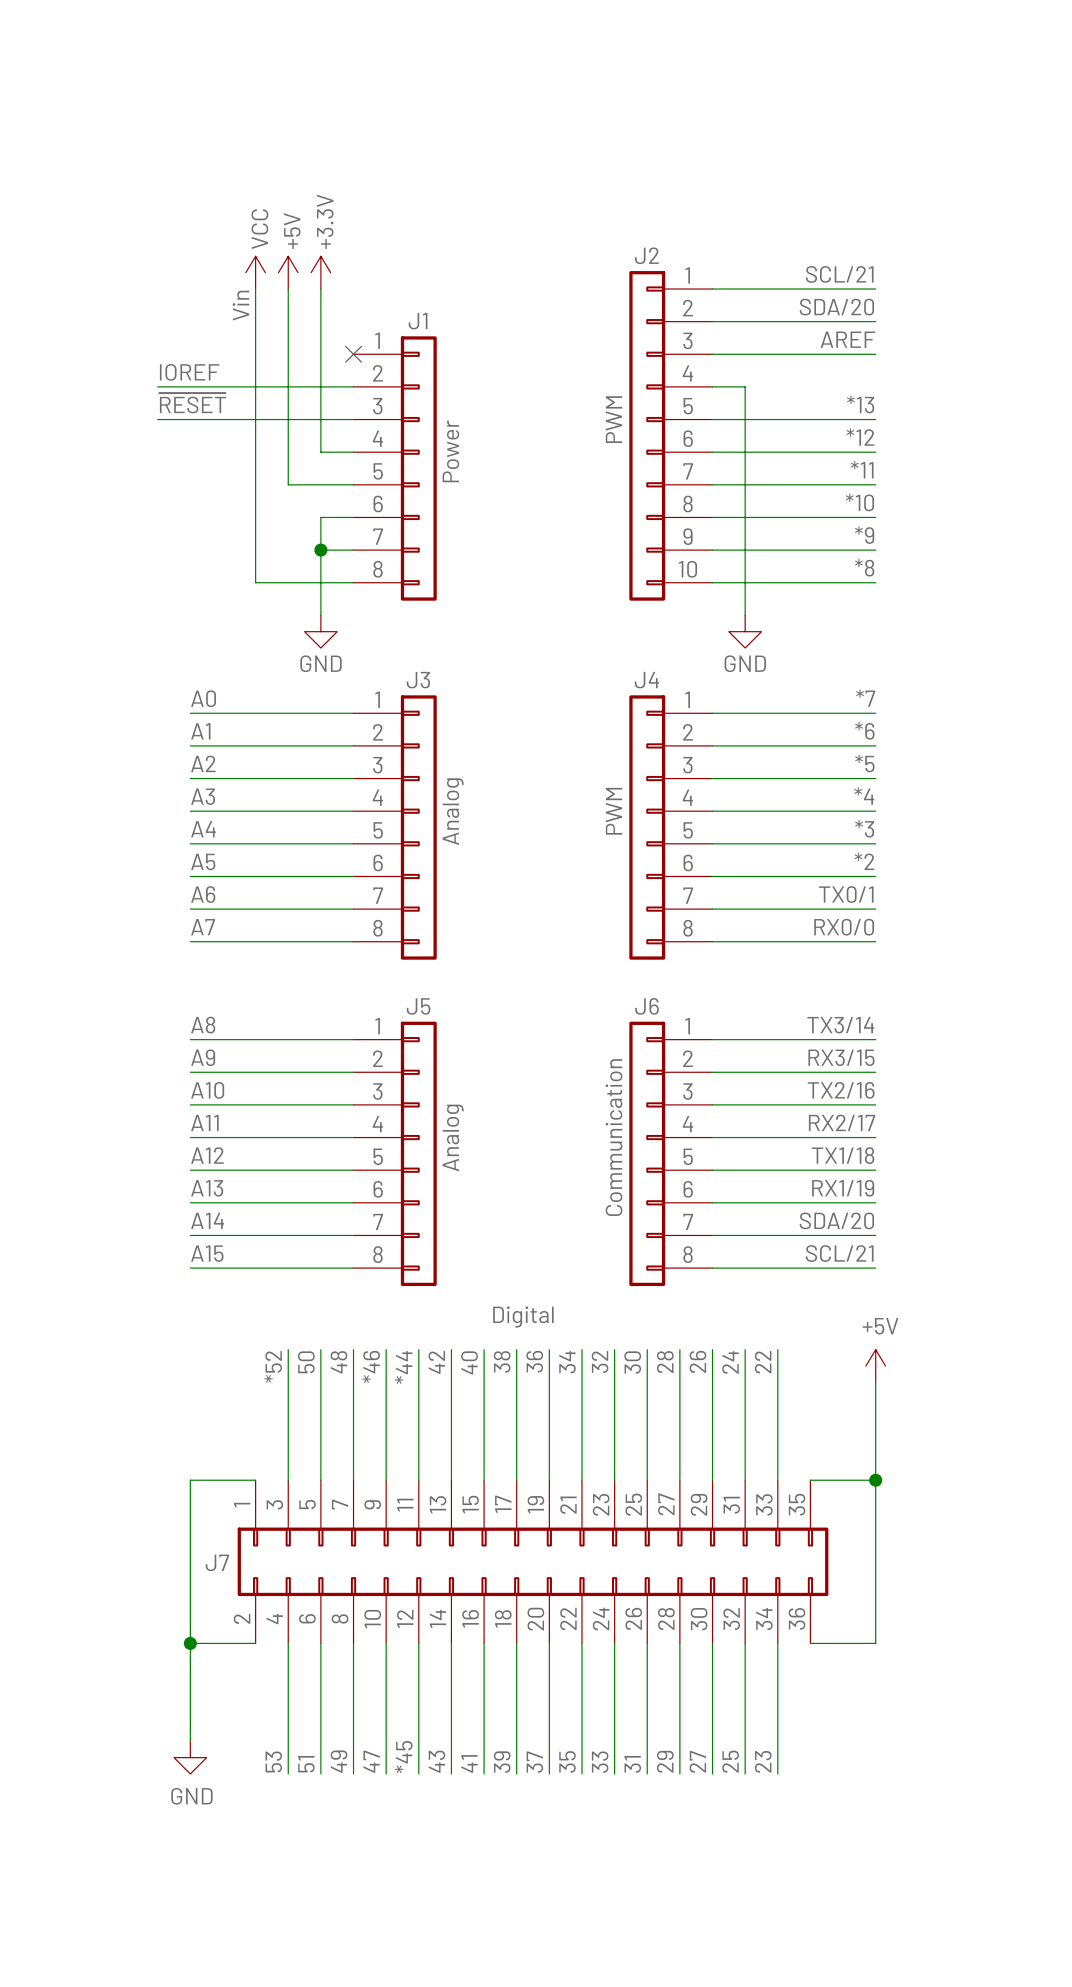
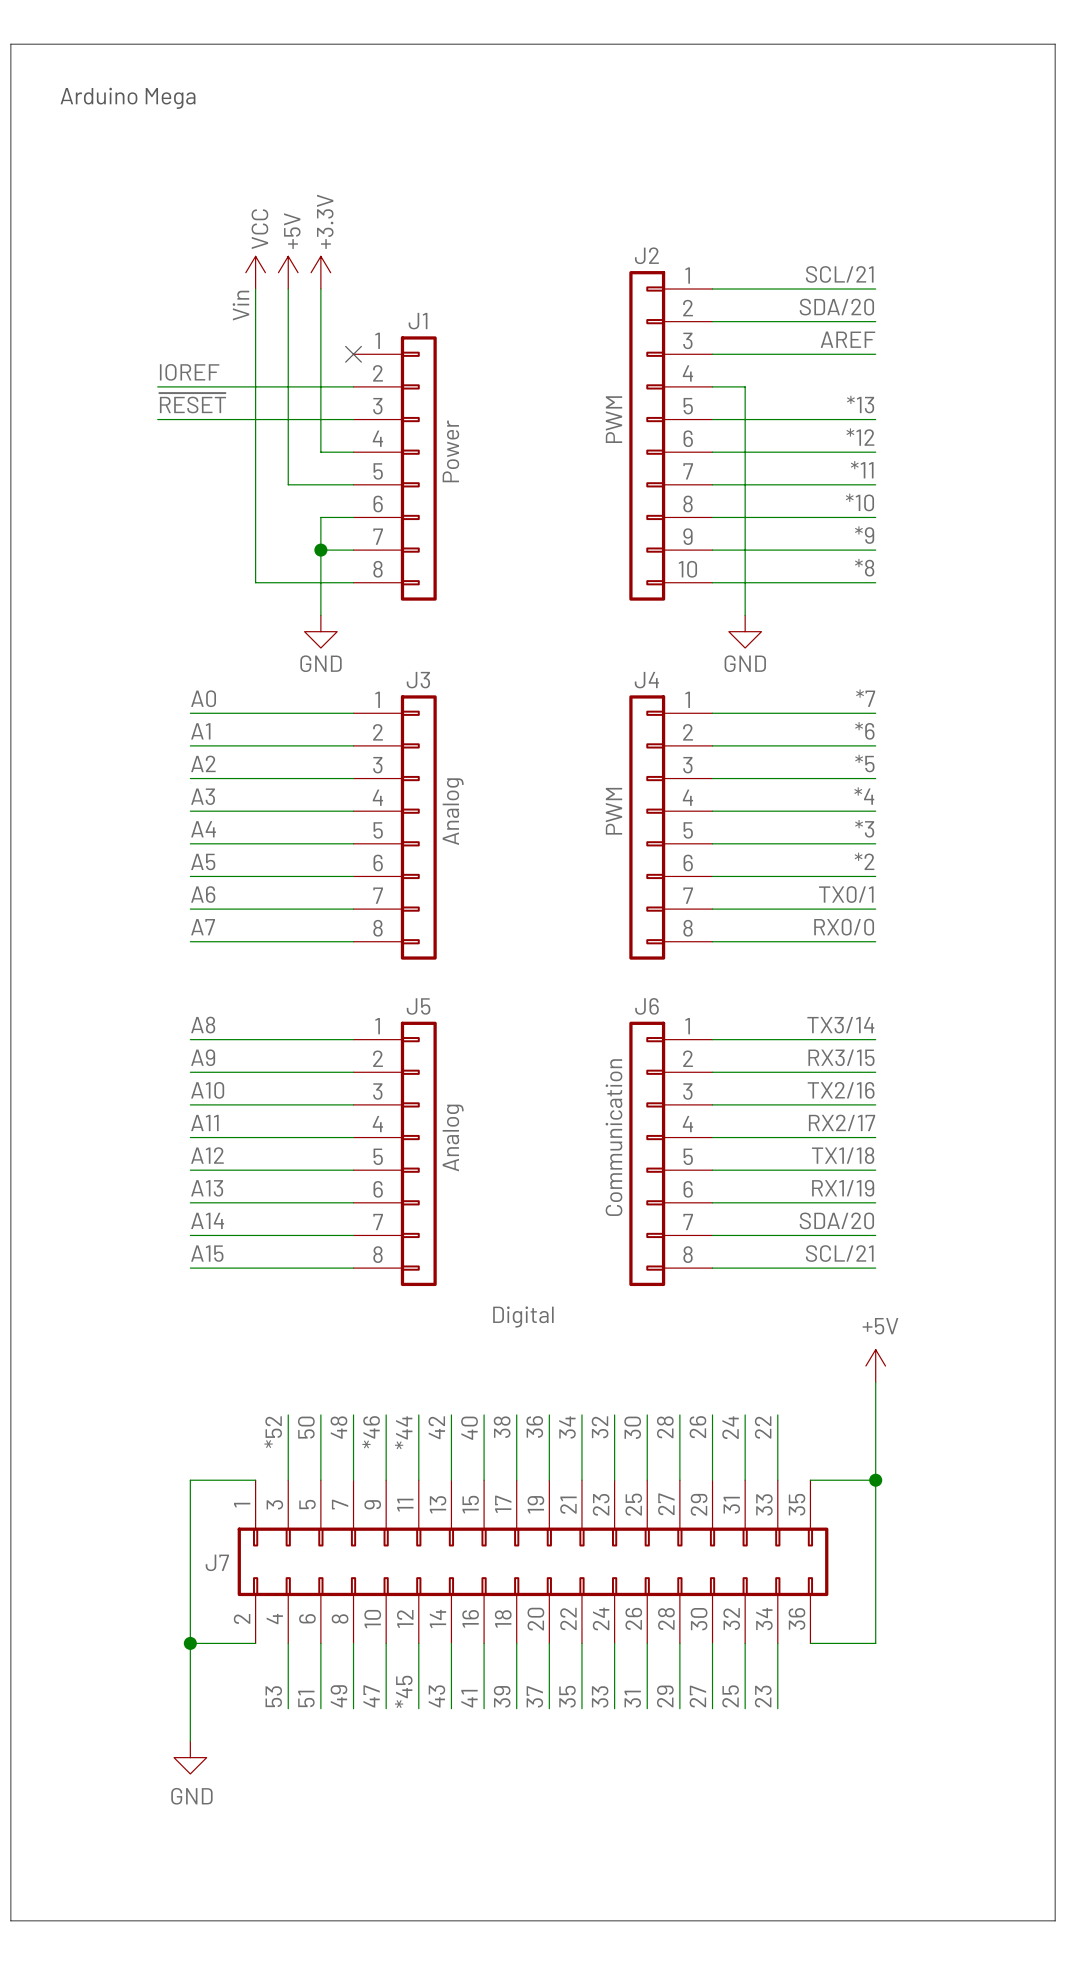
line: none -> (10, 44) (1055, 44) (1055, 1920) (10, 1920) (10, 44)
text: none -> Arduino Mega (127, 98)
wire: (288, 1349) (288, 1414) -> none
wire: (320, 1349) (320, 1414) -> none
wire: (353, 1349) (353, 1414) -> none
wire: (386, 1349) (386, 1414) -> none
wire: (418, 1349) (418, 1414) -> none
wire: (451, 1349) (451, 1414) -> none
wire: (484, 1349) (484, 1414) -> none
wire: (516, 1349) (516, 1414) -> none
wire: (549, 1349) (549, 1414) -> none
wire: (581, 1349) (581, 1414) -> none
wire: (614, 1349) (614, 1414) -> none
wire: (647, 1349) (647, 1414) -> none
wire: (679, 1349) (679, 1414) -> none
wire: (712, 1349) (712, 1414) -> none
wire: (745, 1349) (745, 1414) -> none
wire: (777, 1349) (777, 1414) -> none
label position: 38 (502, 1361) -> 38 (502, 1427)
label position: 36 (534, 1361) -> 36 (534, 1426)
label position: 26 (697, 1361) -> 26 (697, 1427)
label position: 50 (306, 1362) -> 50 (306, 1427)
label position: 48 (338, 1362) -> 48 (338, 1427)
label position: 42 (436, 1362) -> 42 (436, 1427)
label position: 40 (469, 1362) -> 40 (469, 1428)
label position: 34 (567, 1362) -> 34 (567, 1427)
label position: 32 (600, 1362) -> 32 (600, 1427)
label position: 30 (632, 1362) -> 30 (632, 1427)
label position: 28 (665, 1362) -> 28 (665, 1427)
label position: 24 (730, 1362) -> 24 (730, 1427)
label position: 22 (763, 1362) -> 22 (763, 1427)
label position: *52 (273, 1366) -> *52 (273, 1432)
label position: *46 (371, 1366) -> *46 (371, 1432)
label position: *44 (403, 1367) -> *44 (403, 1432)
wire: (288, 1708) (288, 1773) -> none
wire: (320, 1708) (320, 1773) -> none
wire: (353, 1708) (353, 1773) -> none
wire: (386, 1708) (386, 1773) -> none
wire: (418, 1708) (418, 1773) -> none
wire: (451, 1708) (451, 1773) -> none
wire: (484, 1708) (484, 1773) -> none
wire: (516, 1708) (516, 1773) -> none
wire: (549, 1708) (549, 1773) -> none
wire: (581, 1708) (581, 1773) -> none
wire: (614, 1708) (614, 1773) -> none
wire: (647, 1708) (647, 1773) -> none
wire: (679, 1708) (679, 1773) -> none
wire: (712, 1708) (712, 1773) -> none
wire: (745, 1708) (745, 1773) -> none
wire: (777, 1708) (777, 1773) -> none
label position: *45 (403, 1757) -> *45 (403, 1691)
label position: 53 (273, 1761) -> 53 (273, 1696)
label position: 49 (338, 1761) -> 49 (338, 1696)
label position: 47 (371, 1761) -> 47 (371, 1696)
label position: 43 (436, 1761) -> 43 (436, 1696)
label position: 35 (567, 1761) -> 35 (567, 1696)
label position: 29 (665, 1761) -> 29 (665, 1696)
label position: 27 (697, 1761) -> 27 (697, 1696)
label position: 25 (730, 1761) -> 25 (730, 1696)
label position: 23 (763, 1761) -> 23 (763, 1696)
label position: 39 (502, 1762) -> 39 (502, 1696)
label position: 37 (534, 1762) -> 37 (534, 1696)
label position: 33 (600, 1762) -> 33 (600, 1696)
label position: 41 (469, 1763) -> 41 (469, 1698)
label position: 51 (306, 1764) -> 51 (306, 1698)
label position: 31 (632, 1764) -> 31 (632, 1699)

